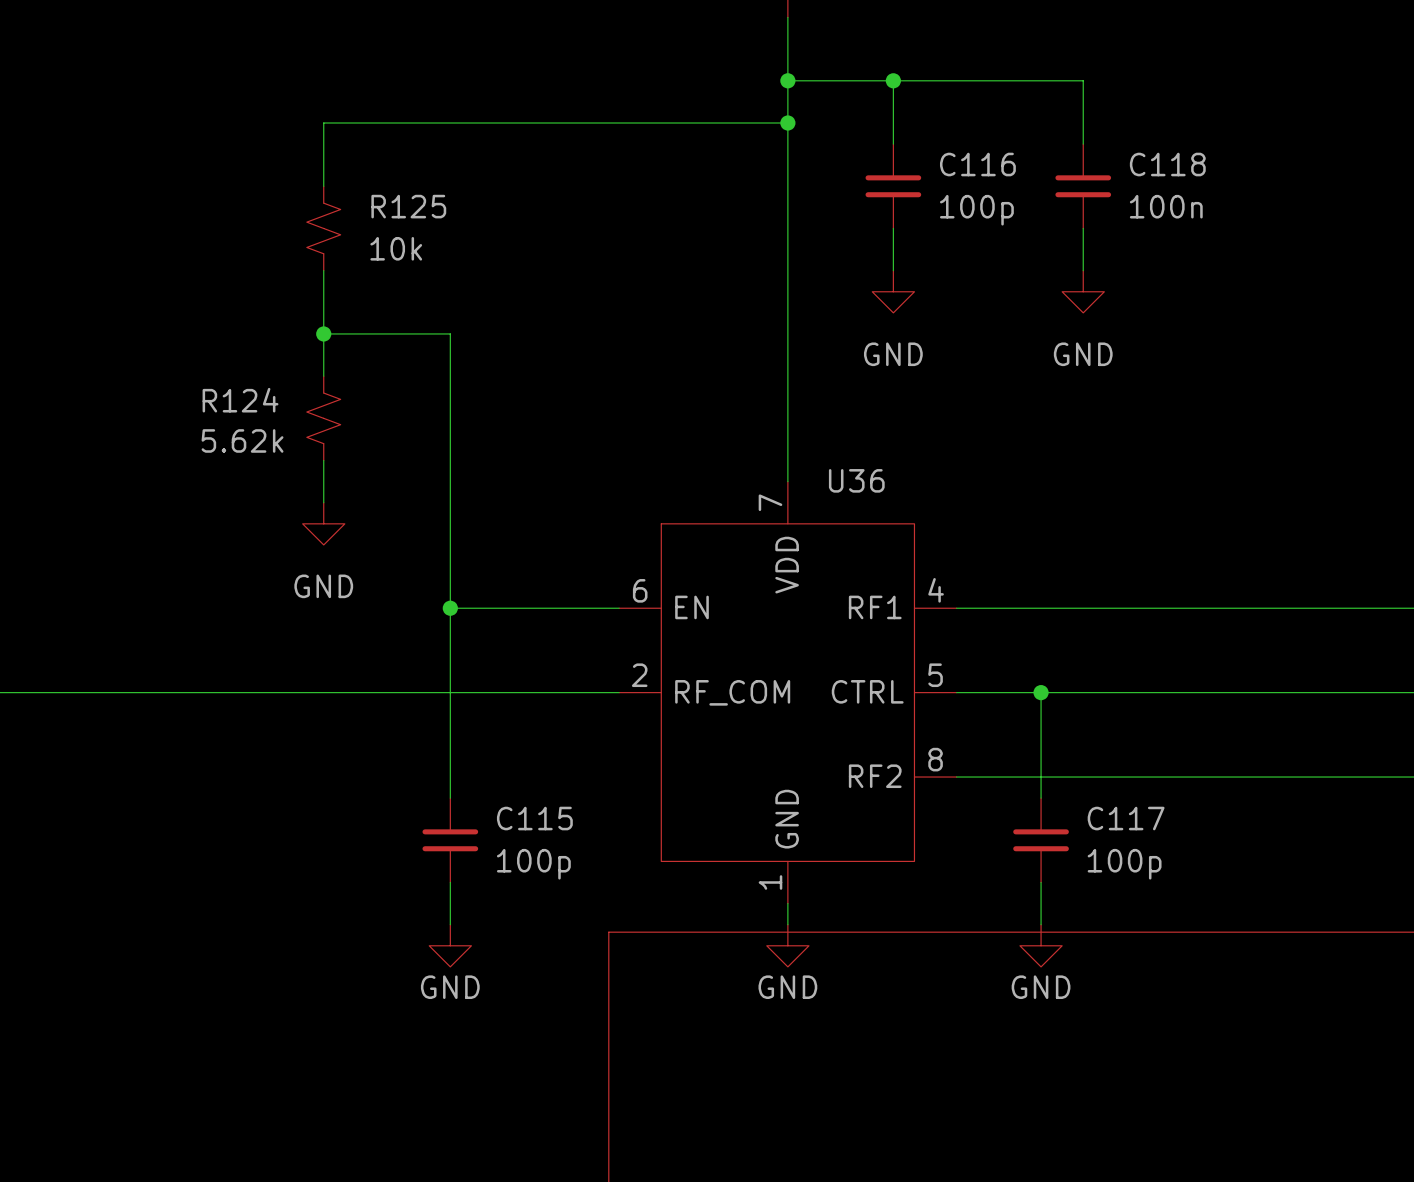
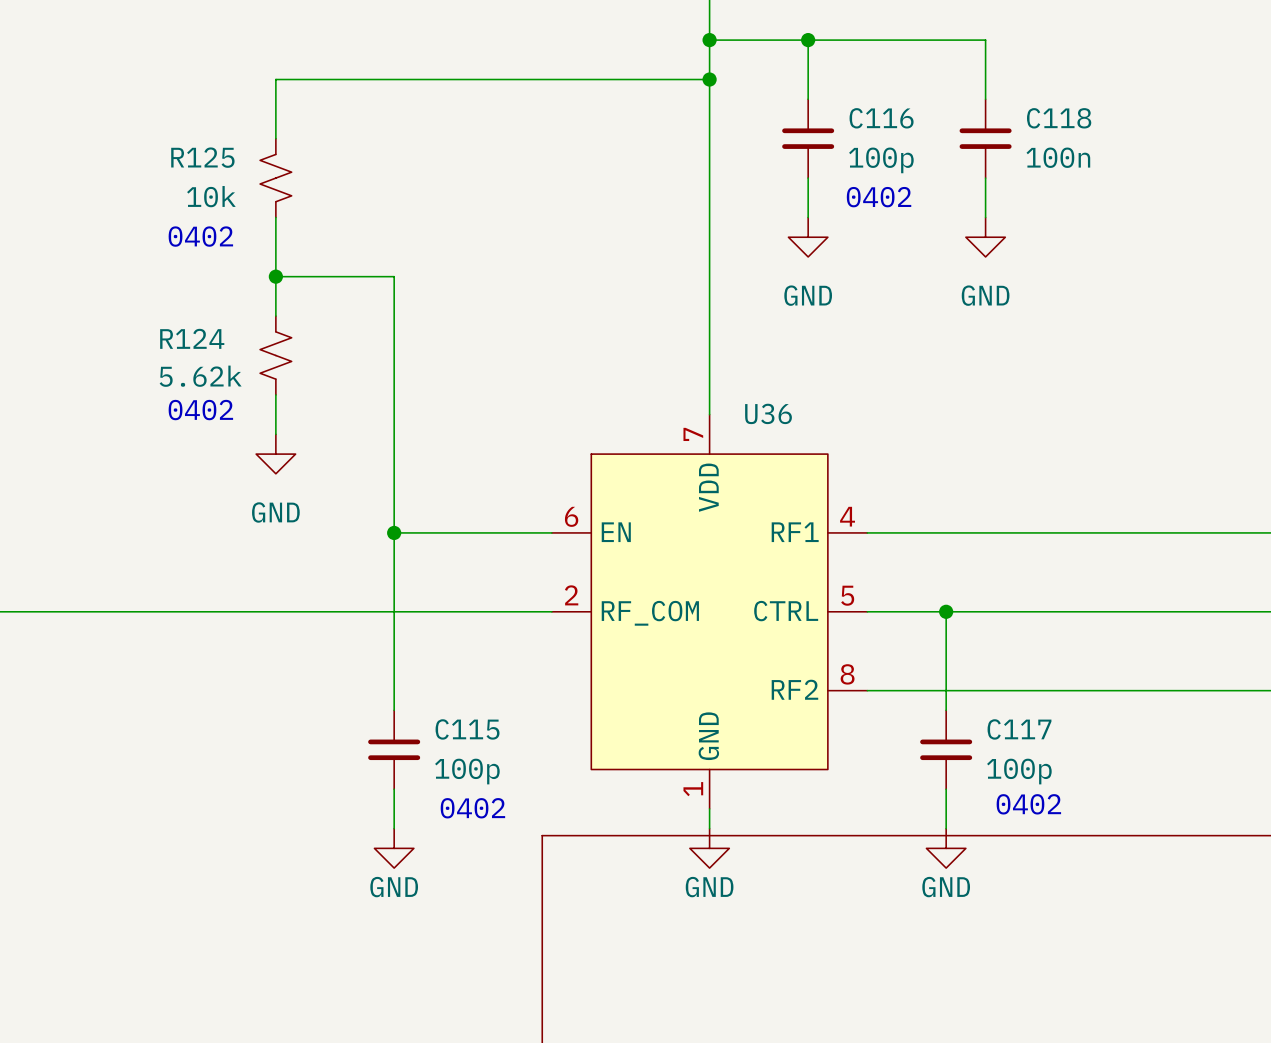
R125 flip: as is (323, 228) -> left-right (275, 178)
text: none -> 0402 (879, 197)
text: none -> 0402 (200, 236)
text: none -> 0402 (200, 410)
text: none -> 0402 (1028, 804)
text: none -> 0402 (472, 808)

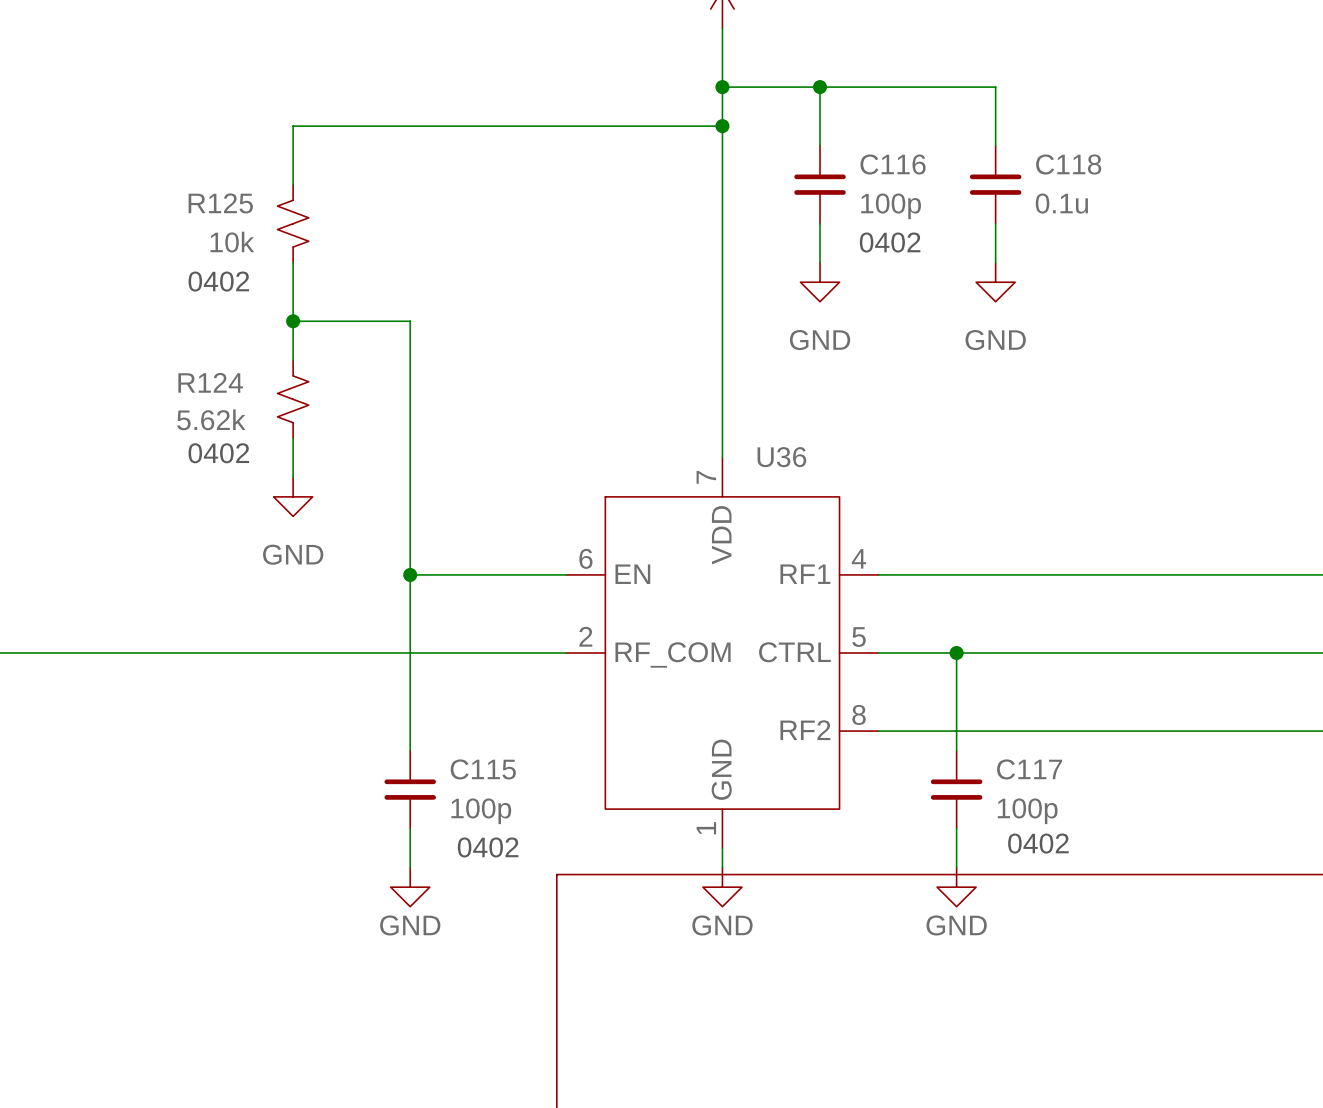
C118 value: 100n (1058, 157) -> 0.1u (1061, 203)

